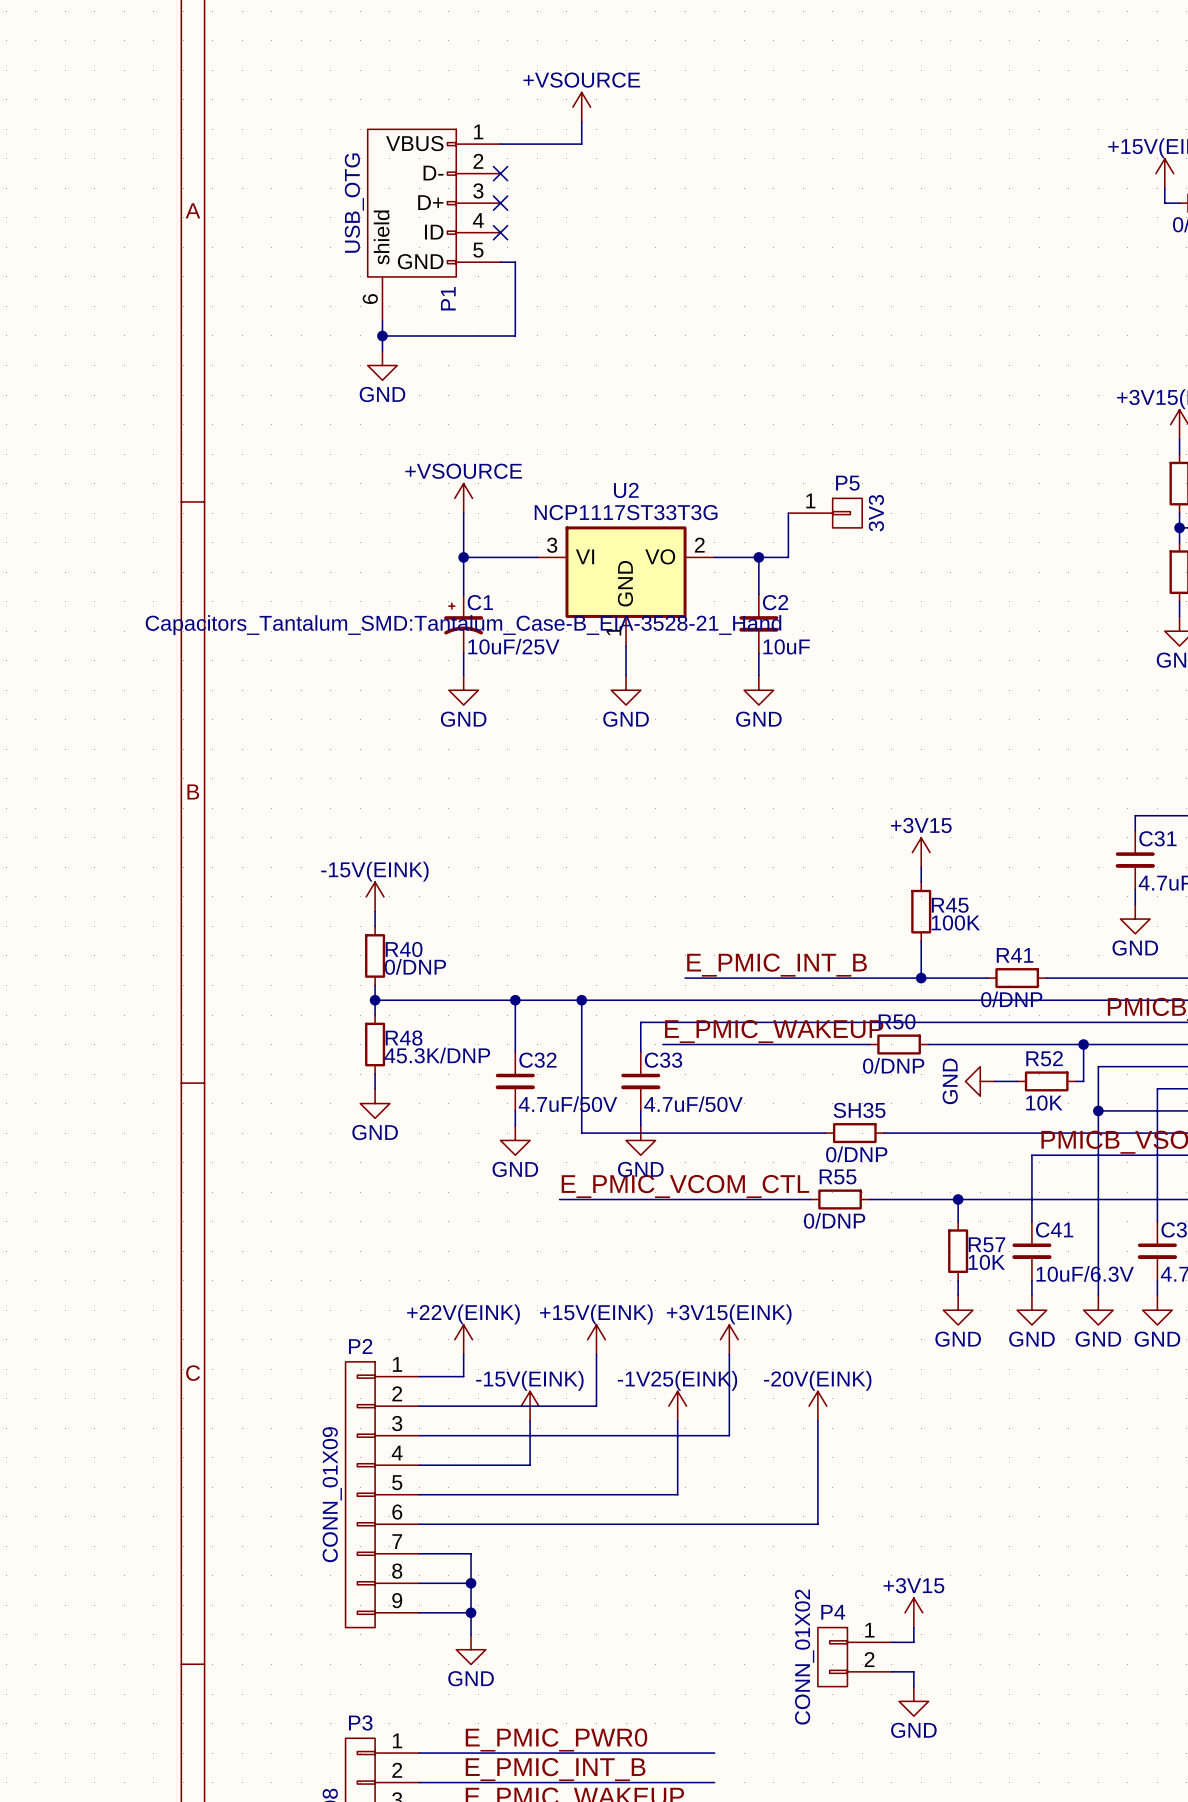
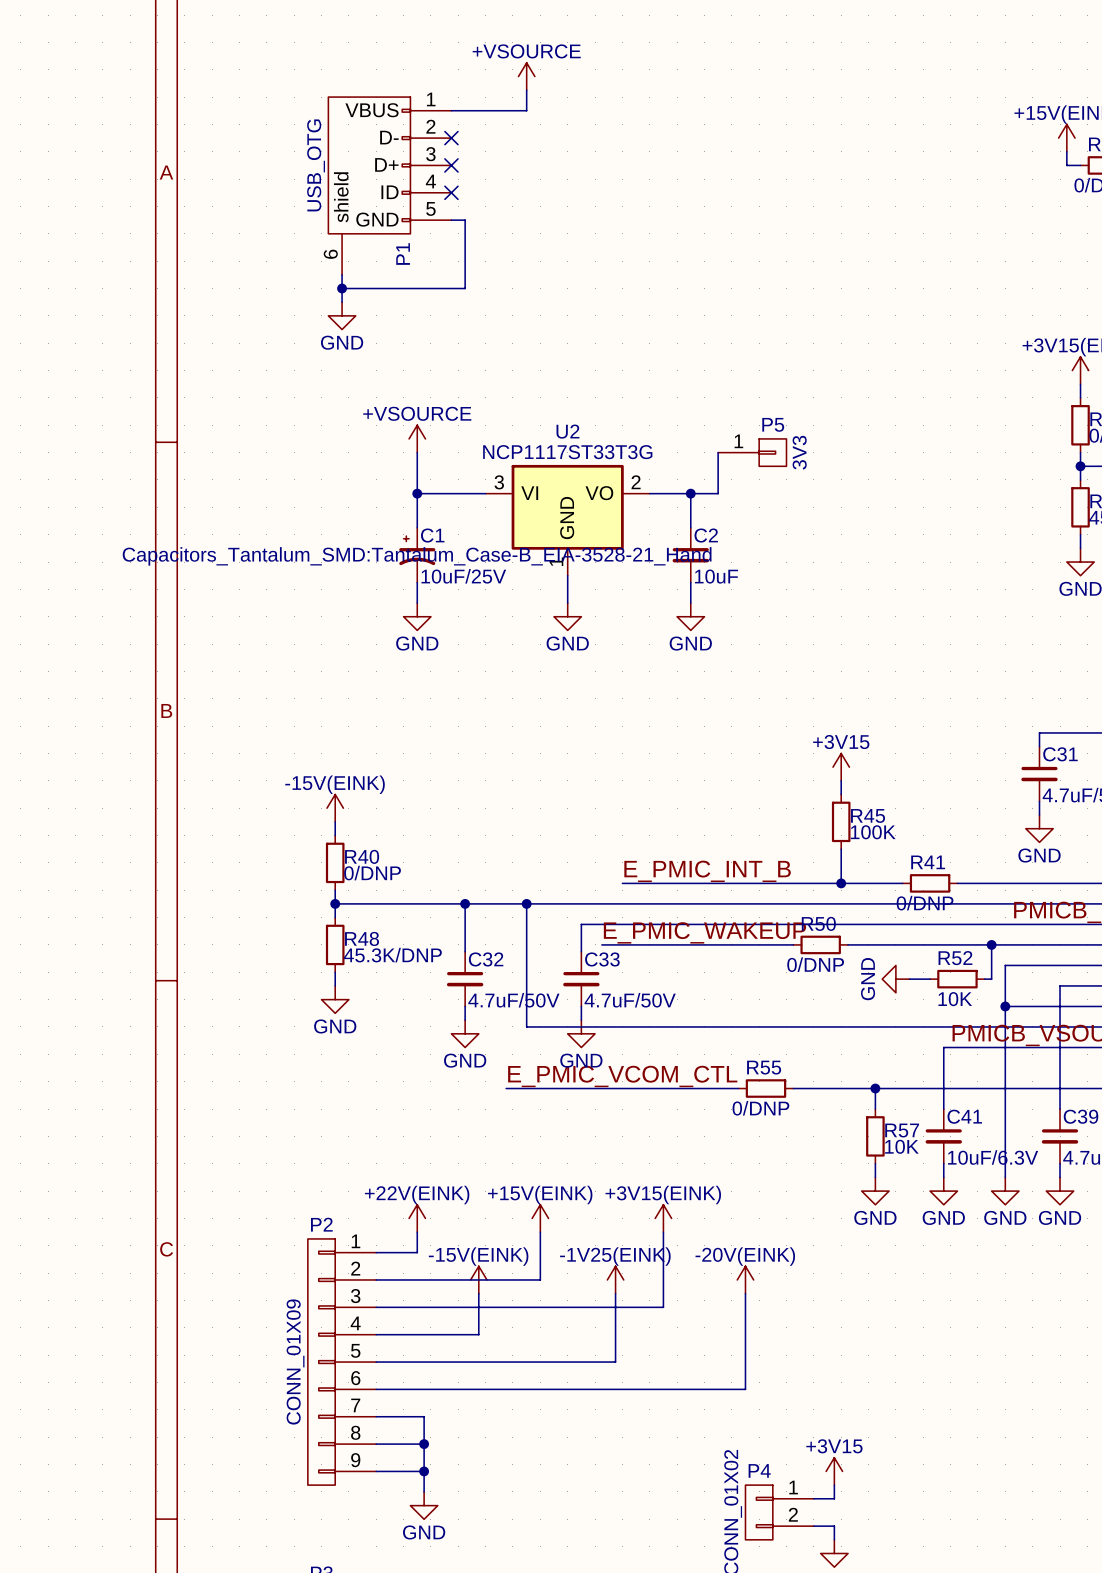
wire: none -> (752, 1026) (807, 1026)
SH35: 0/DNP (854, 1133) -> none

